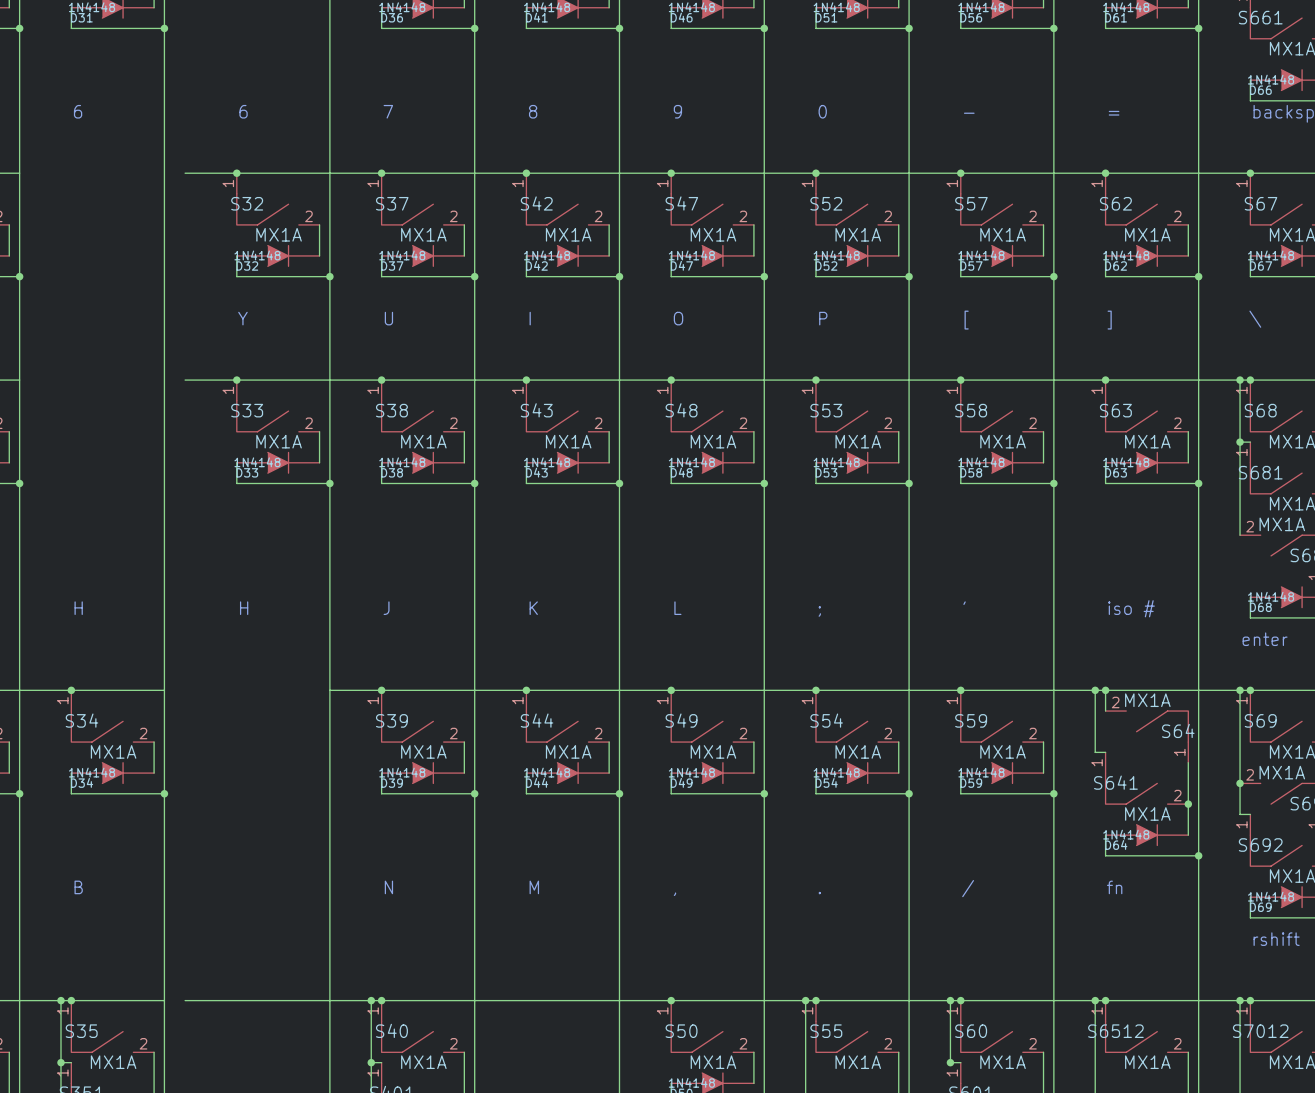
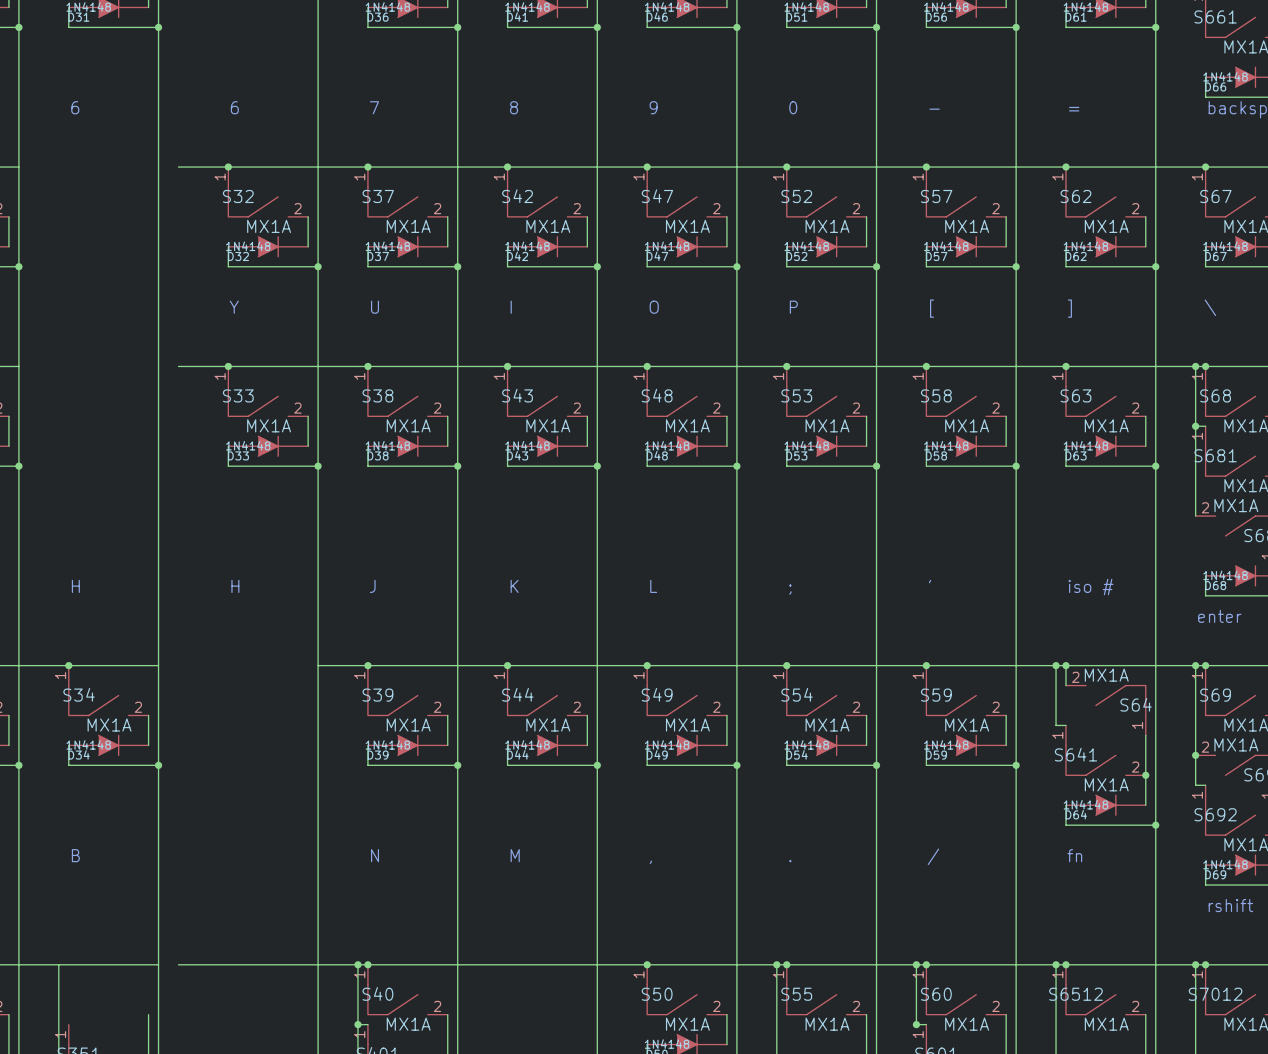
junction: (61, 1000) -> none
junction: (71, 1000) -> none
S35: MX1A (112, 1026) -> none
wire: (61, 1062) (71, 1062) -> none
junction: (61, 1062) -> none

